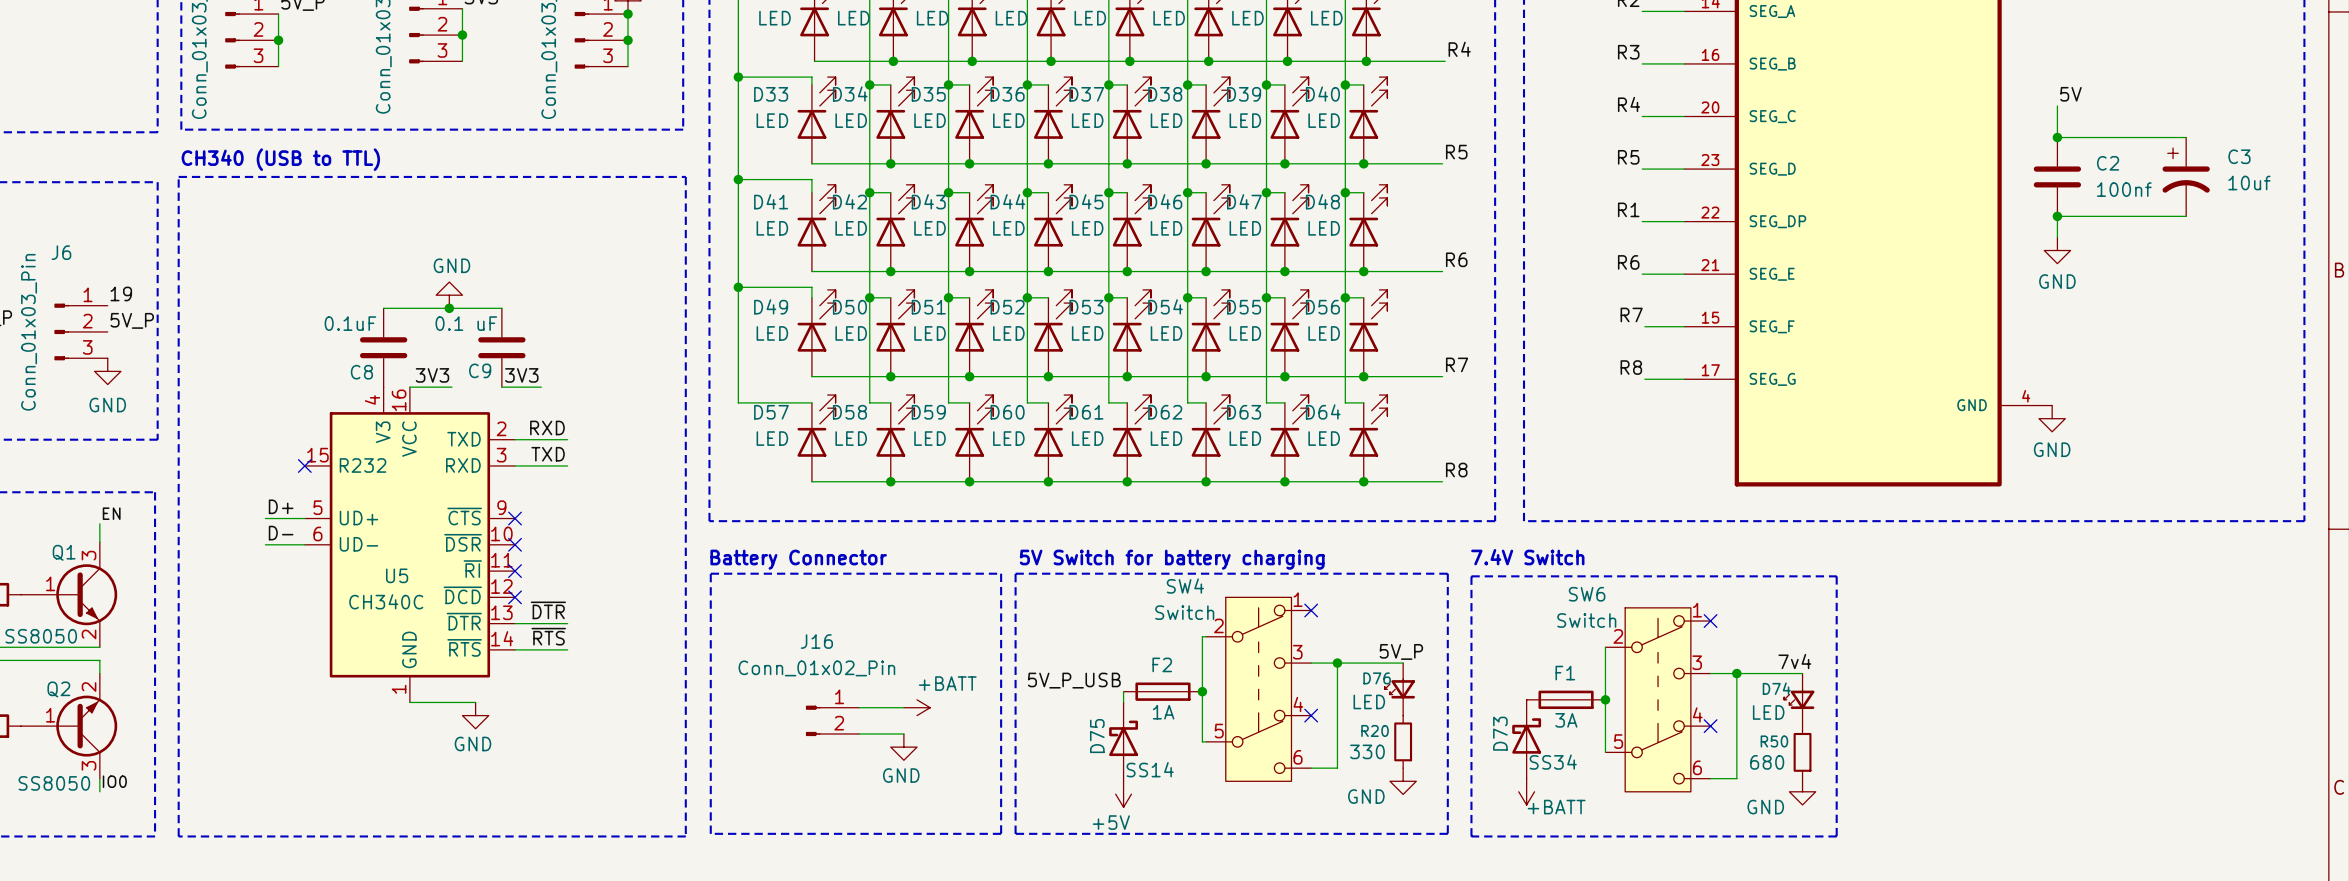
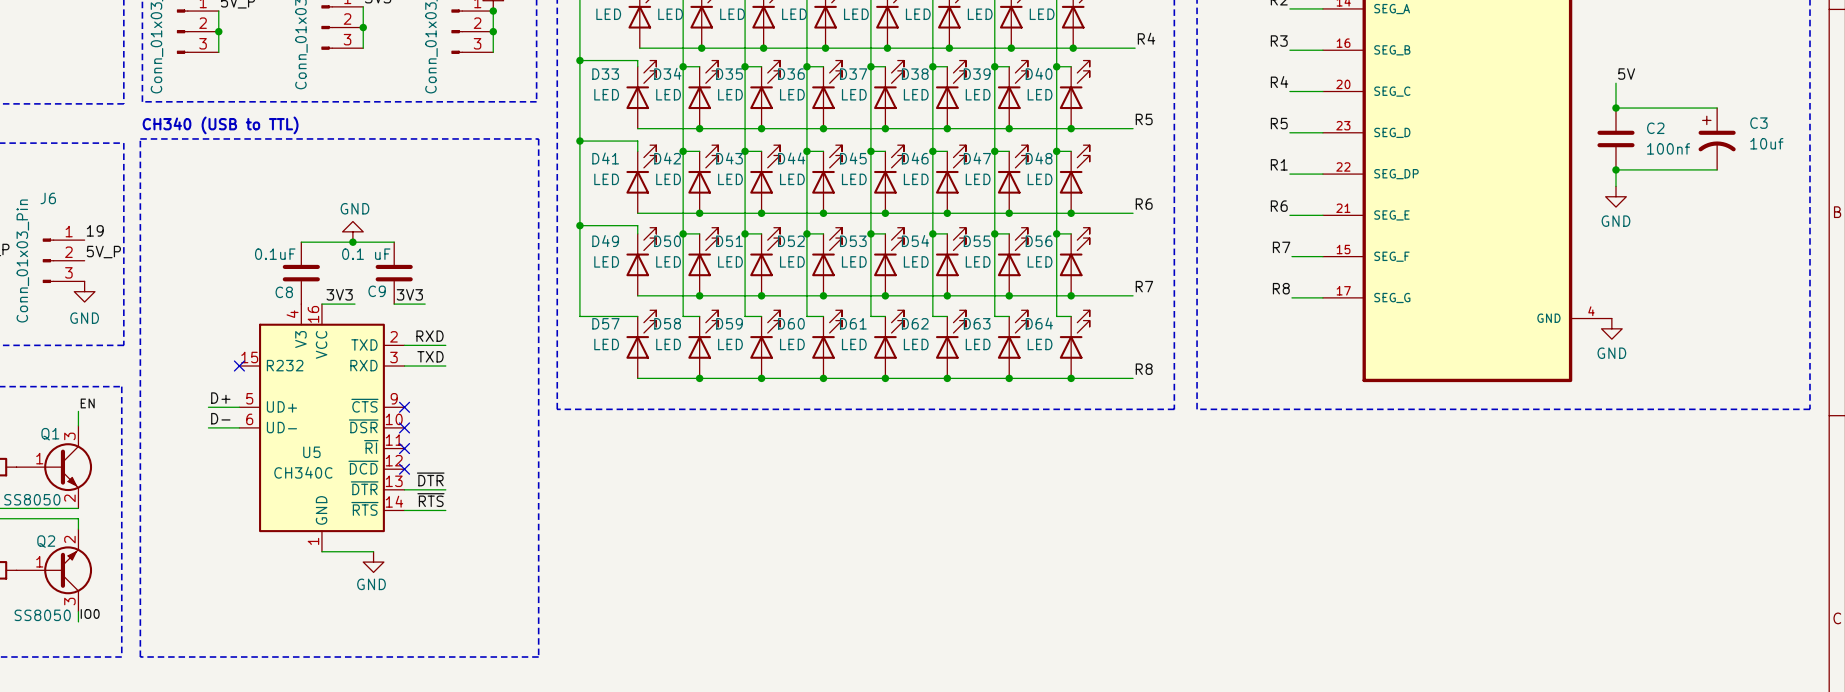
text: 7.4V Switch (1527, 557) -> none
text: Battery Connector (798, 559) -> none
text: 5V Switch for battery charging (1172, 559) -> none
line: (710, 573) (1001, 573) (1001, 833) (710, 833) (710, 573) -> none
line: (1015, 573) (1447, 573) (1447, 833) (1015, 833) (1015, 573) -> none
line: (1471, 576) (1836, 576) (1836, 836) (1471, 836) (1471, 576) -> none
no-connect mark: (1311, 610) -> none
no-connect mark: (1710, 621) -> none
wire: (1206, 636) (1202, 636) (1202, 741) (1206, 741) -> none
wire: (1605, 647) (1605, 752) -> none
label: 5V_P (1401, 651) -> none
label: 7v4 (1794, 661) -> none
wire: (1311, 663) (1403, 663) -> none
wire: (1337, 663) (1337, 768) (1311, 768) -> none
junction: (1337, 663) -> none
wire: (1710, 673) (1802, 673) -> none
wire: (1736, 673) (1736, 778) (1710, 778) -> none
junction: (1736, 673) -> none
label: 5V_P_USB (1074, 680) -> none
SW4: Switch (1258, 689) -> none
D76: LED (1399, 689) -> none
wire: (1123, 691) (1123, 702) -> none
F2: 1A (1162, 691) -> none
junction: (1202, 691) -> none
F1: 3A (1566, 699) -> none
junction: (1605, 699) -> none
SW6: Switch (1658, 699) -> none
D74: LED (1799, 699) -> none
wire: (859, 707) (903, 707) -> none
power symbol: +BATT (917, 707) -> none
no-connect mark: (1311, 715) -> none
J16: Conn_01x02_Pin (832, 720) -> none
no-connect mark: (1710, 726) -> none
wire: (859, 733) (903, 733) -> none
D73: SS34 (1526, 739) -> none
D75: SS14 (1123, 741) -> none
R20: 330 (1403, 741) -> none
power symbol: GND (903, 747) -> none
R50: 680 (1802, 752) -> none
power symbol: GND (1403, 781) -> none
power symbol: +BATT (1526, 791) -> none
power symbol: GND (1802, 791) -> none
power symbol: +5V (1123, 794) -> none

